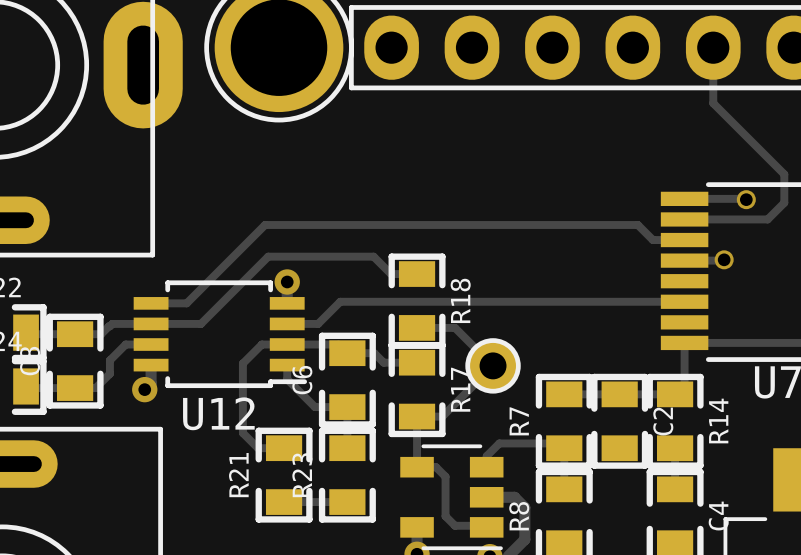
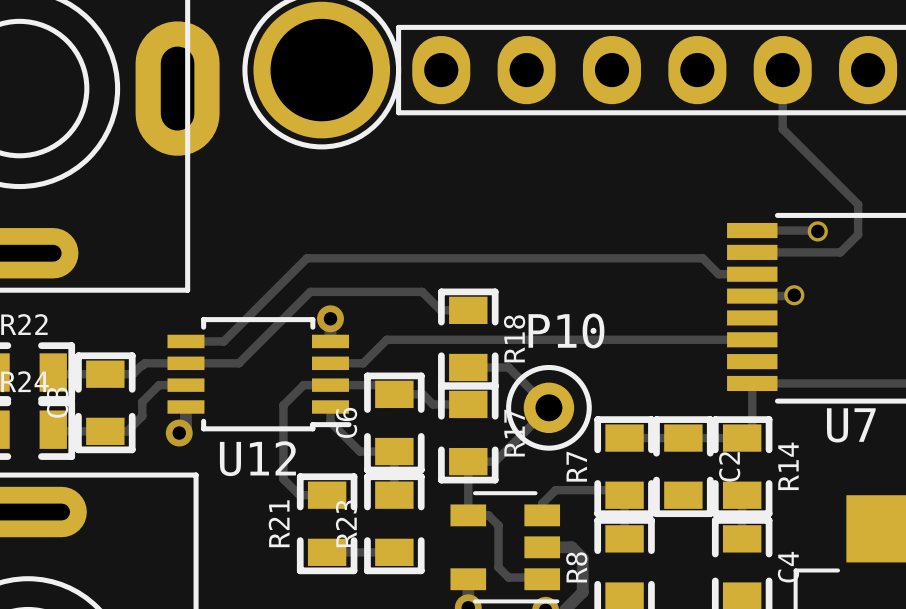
part: (493, 365) -> none
P10: none -> (548, 407)

